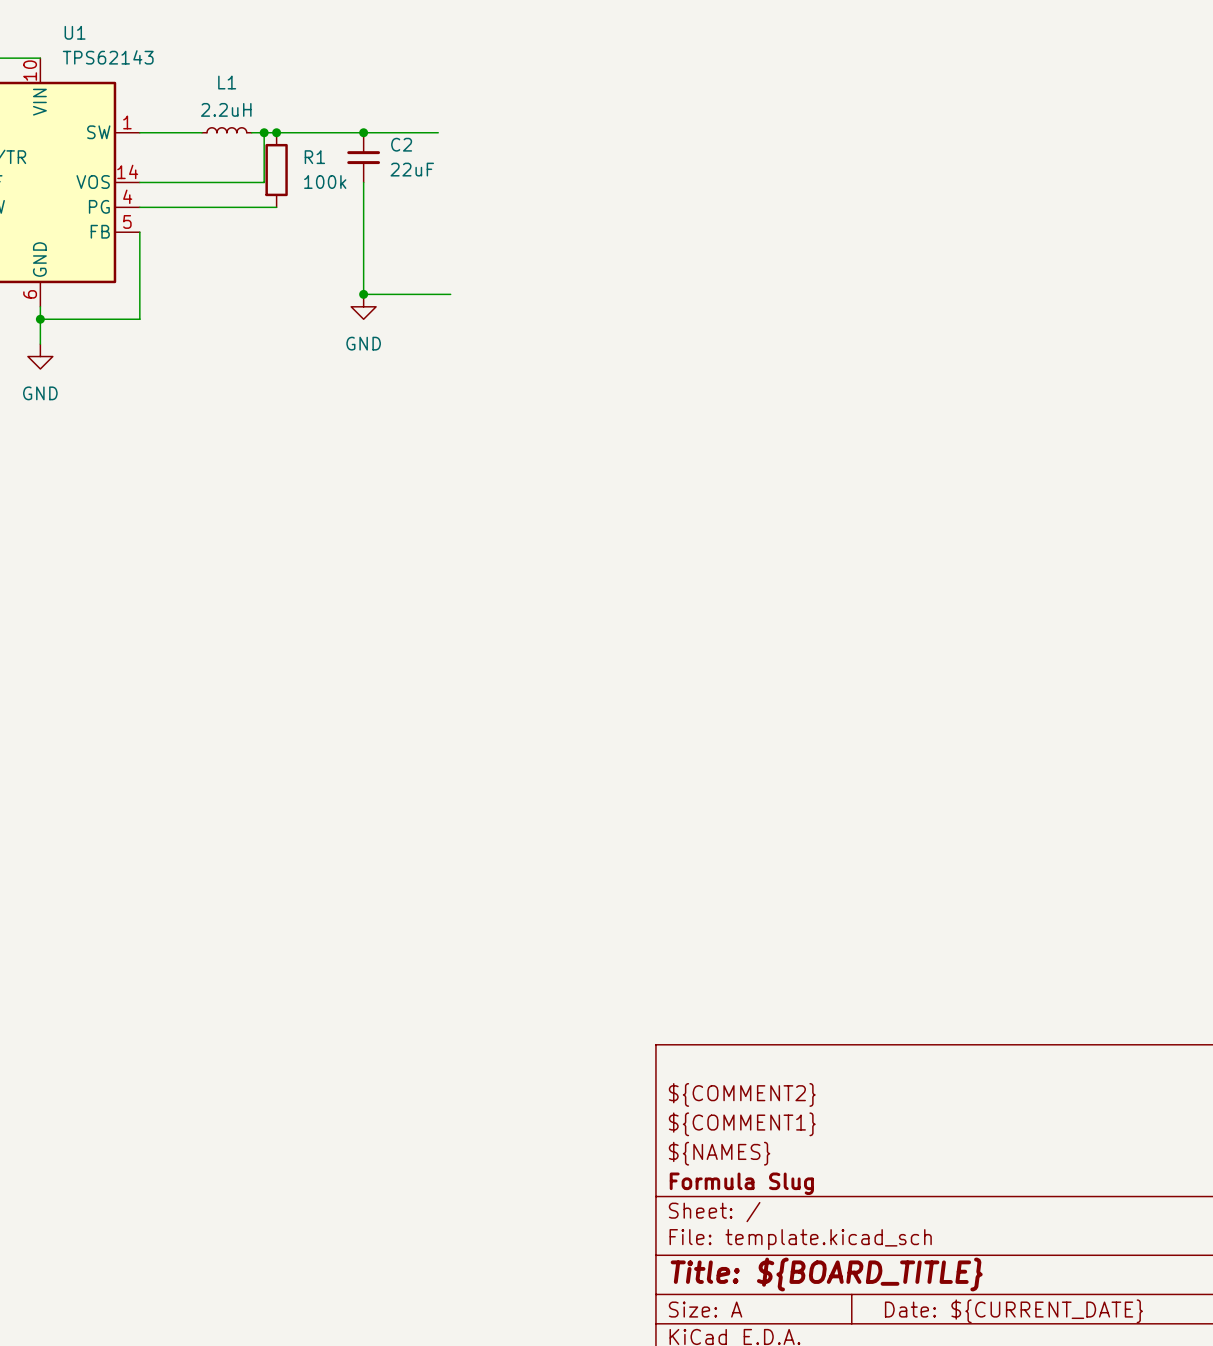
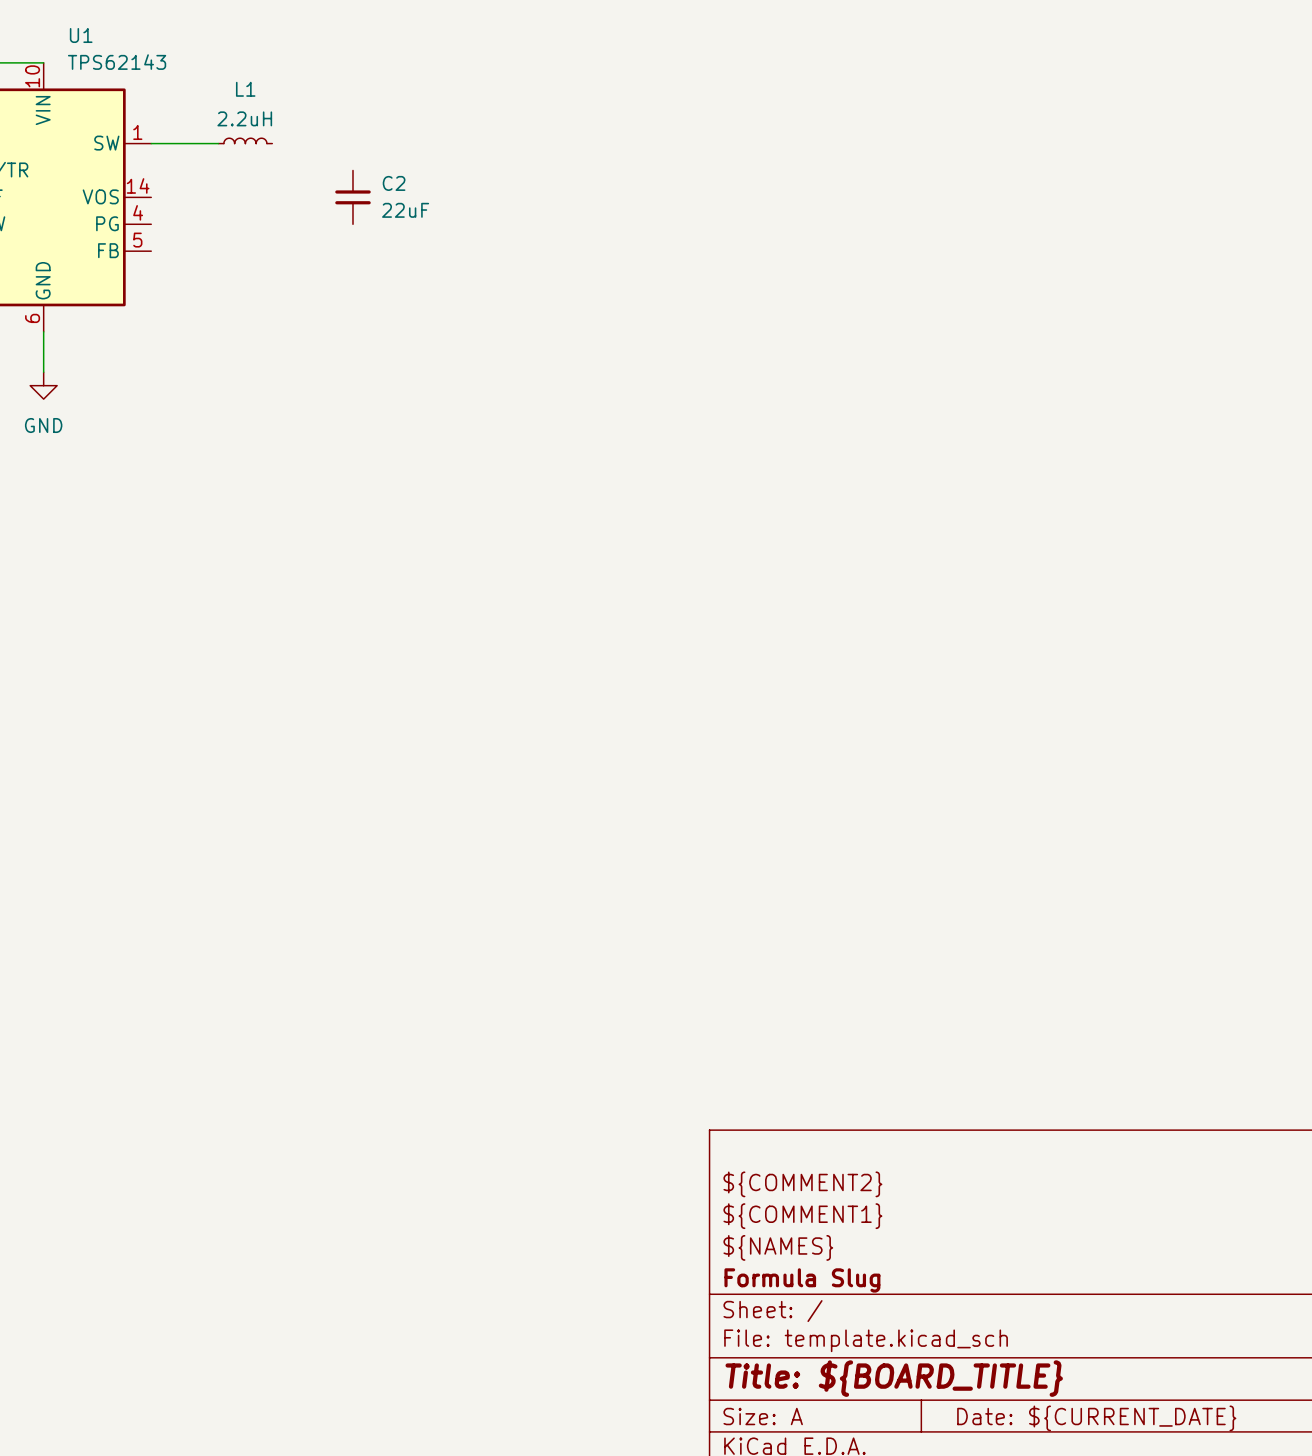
wire: (251, 132) (438, 132) -> none
wire: (264, 132) (264, 182) (139, 182) -> none
junction: (264, 132) -> none
junction: (276, 132) -> none
junction: (363, 132) -> none
C2 position: (363, 157) -> (352, 197)
R1: 100k (276, 170) -> none
wire: (363, 182) (363, 294) (450, 294) -> none
wire: (139, 207) (276, 207) -> none
wire: (139, 232) (139, 319) (40, 319) -> none
junction: (363, 294) -> none
power symbol: GND (363, 306) -> none
junction: (40, 319) -> none

